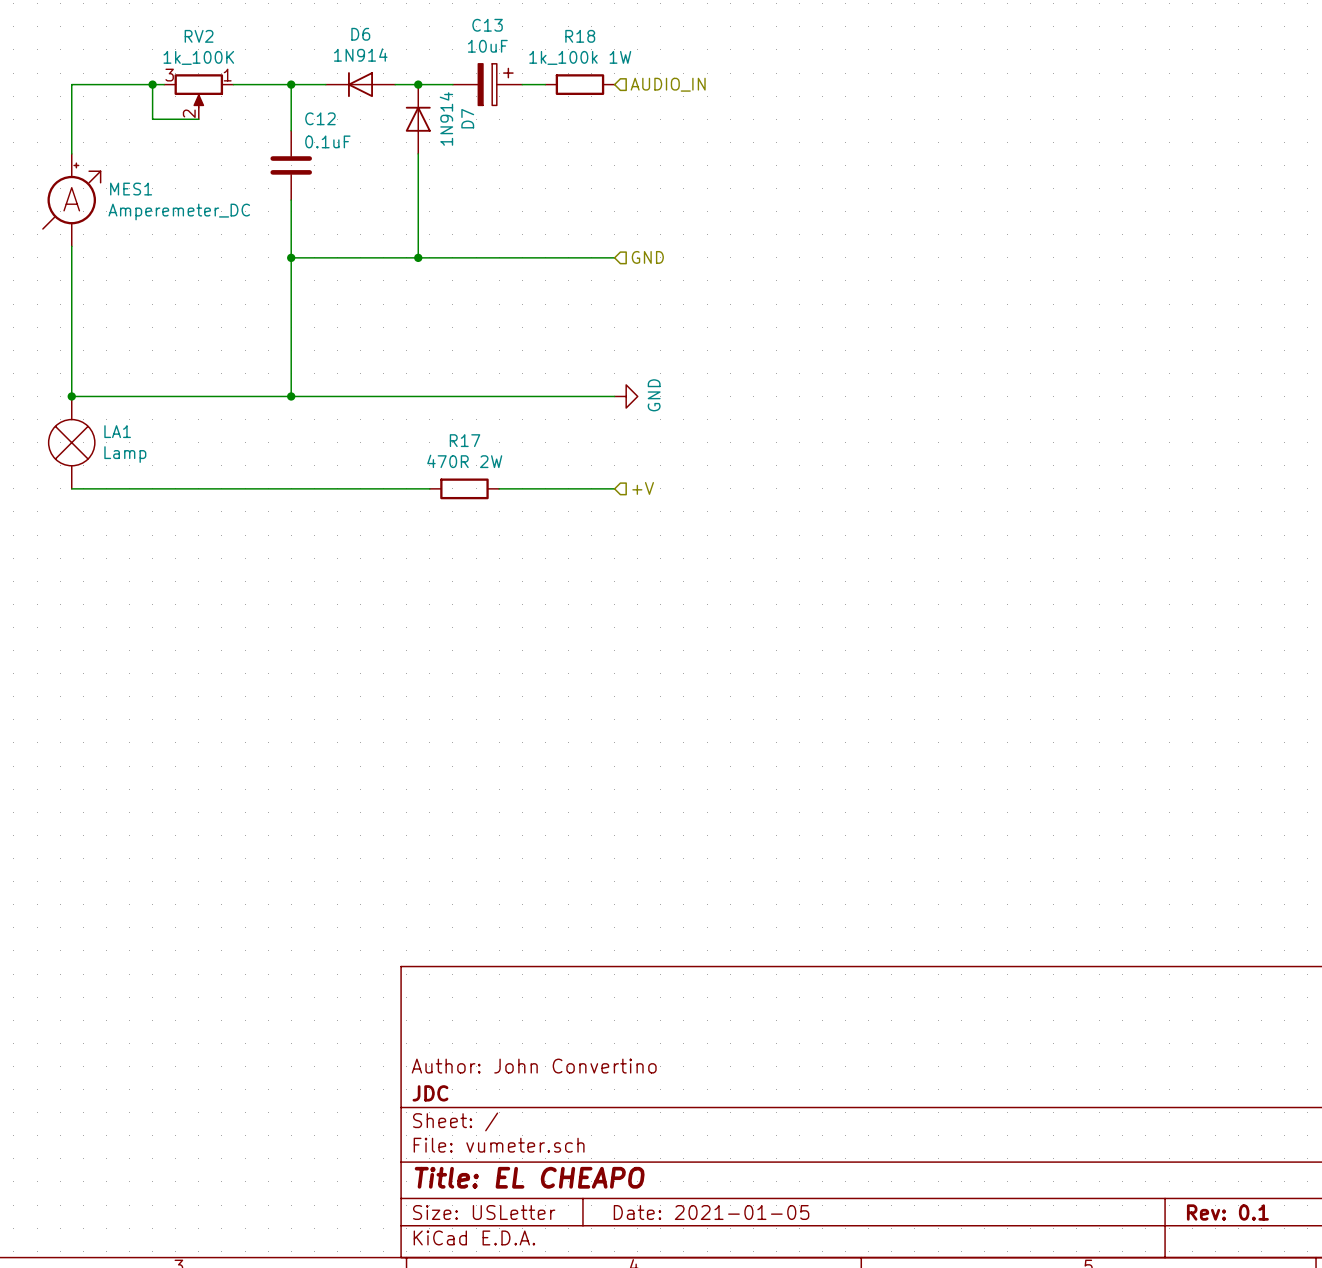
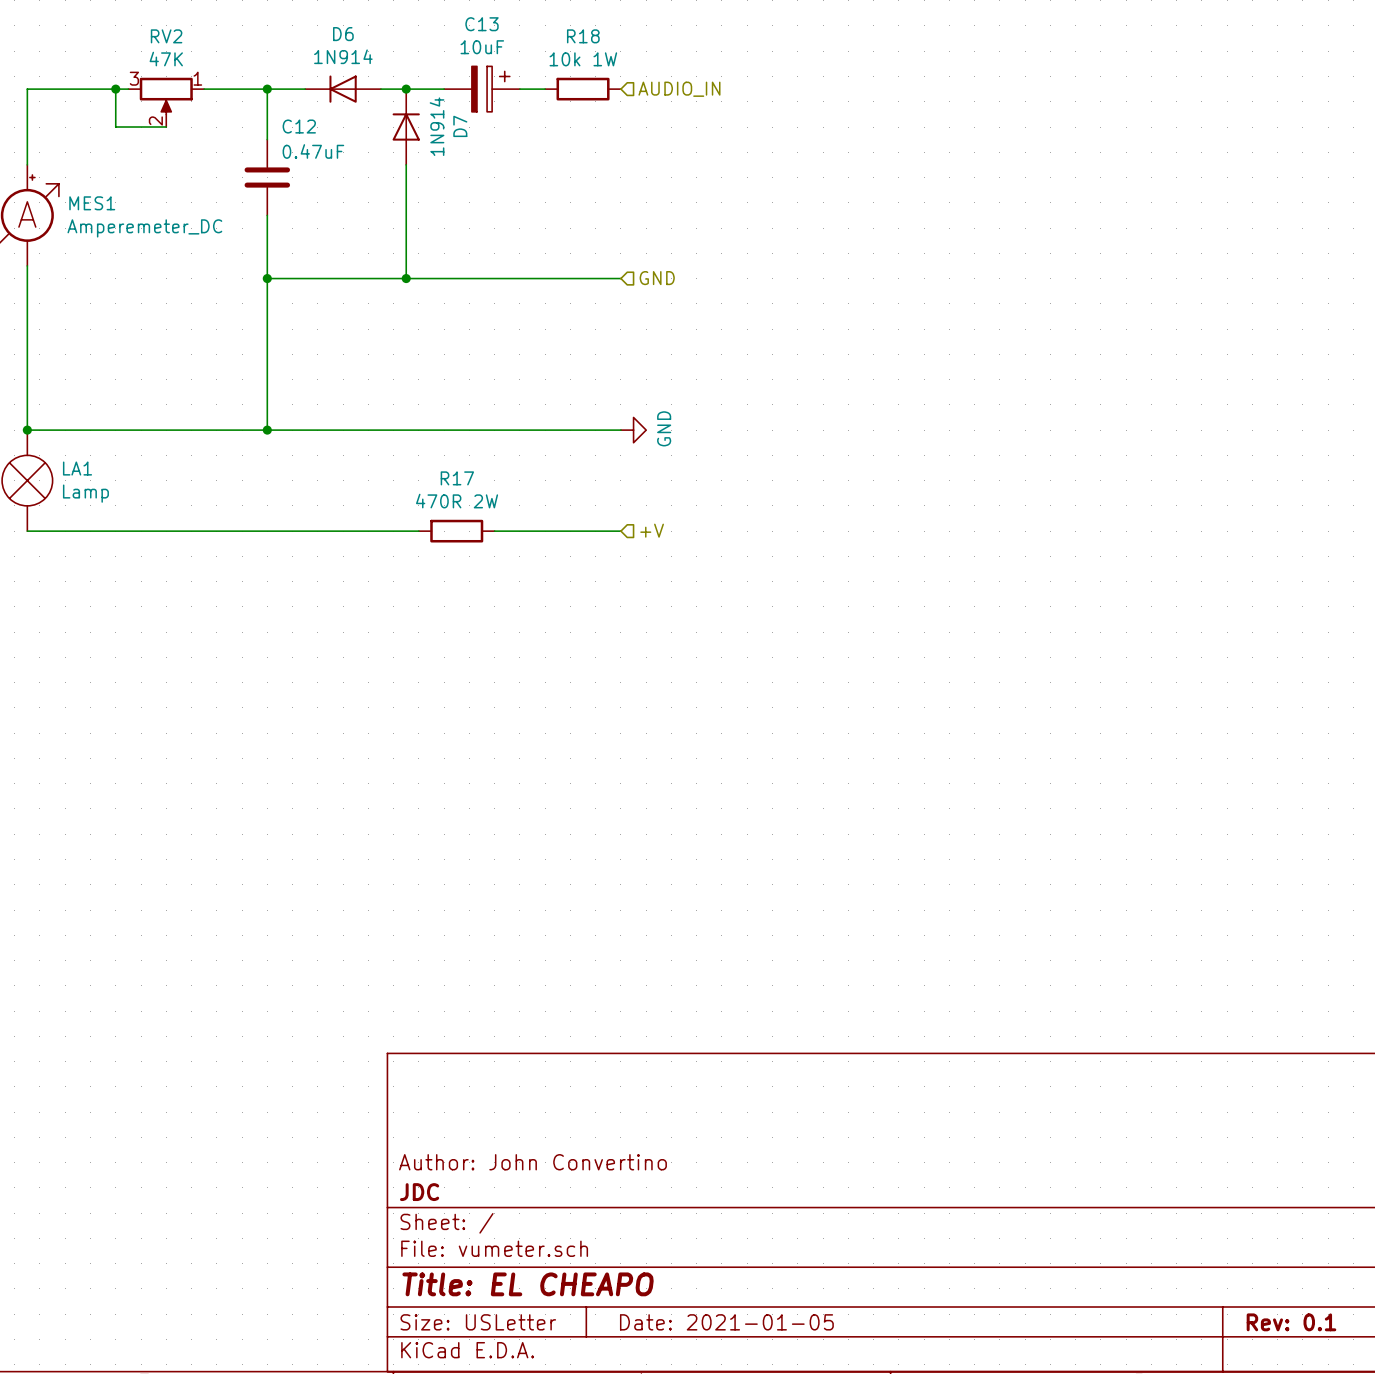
RV2 value: 1k_100K (198, 57) -> 47K (166, 59)
R18 value: 1k_100k 1W (580, 57) -> 10k 1W (583, 59)
C12 value: 0.1uF (327, 141) -> 0.47uF (313, 151)

